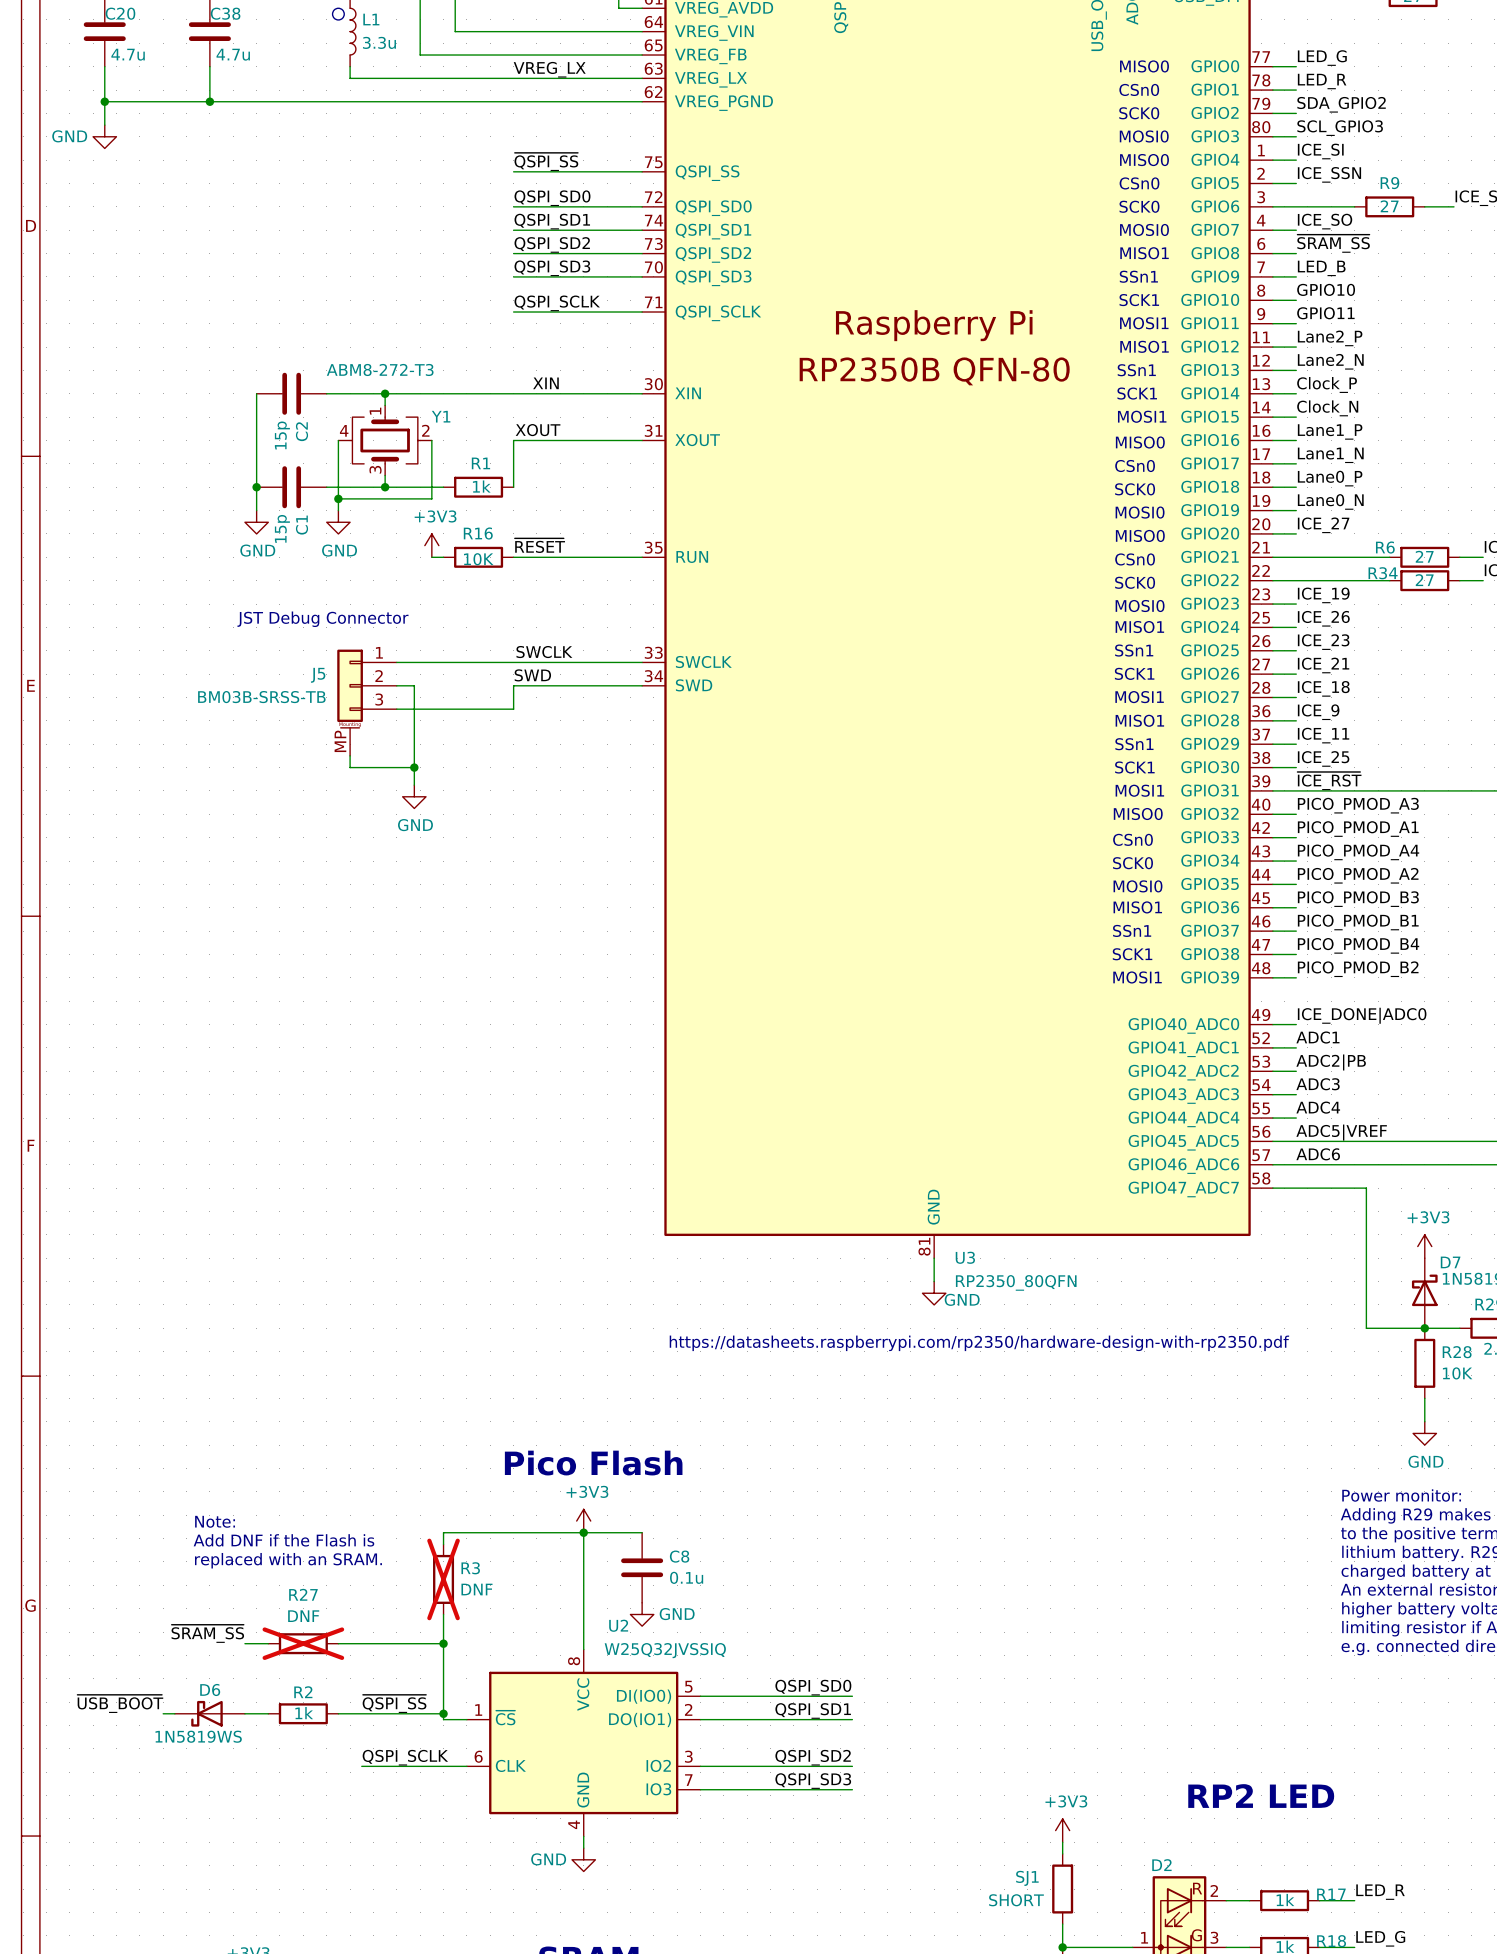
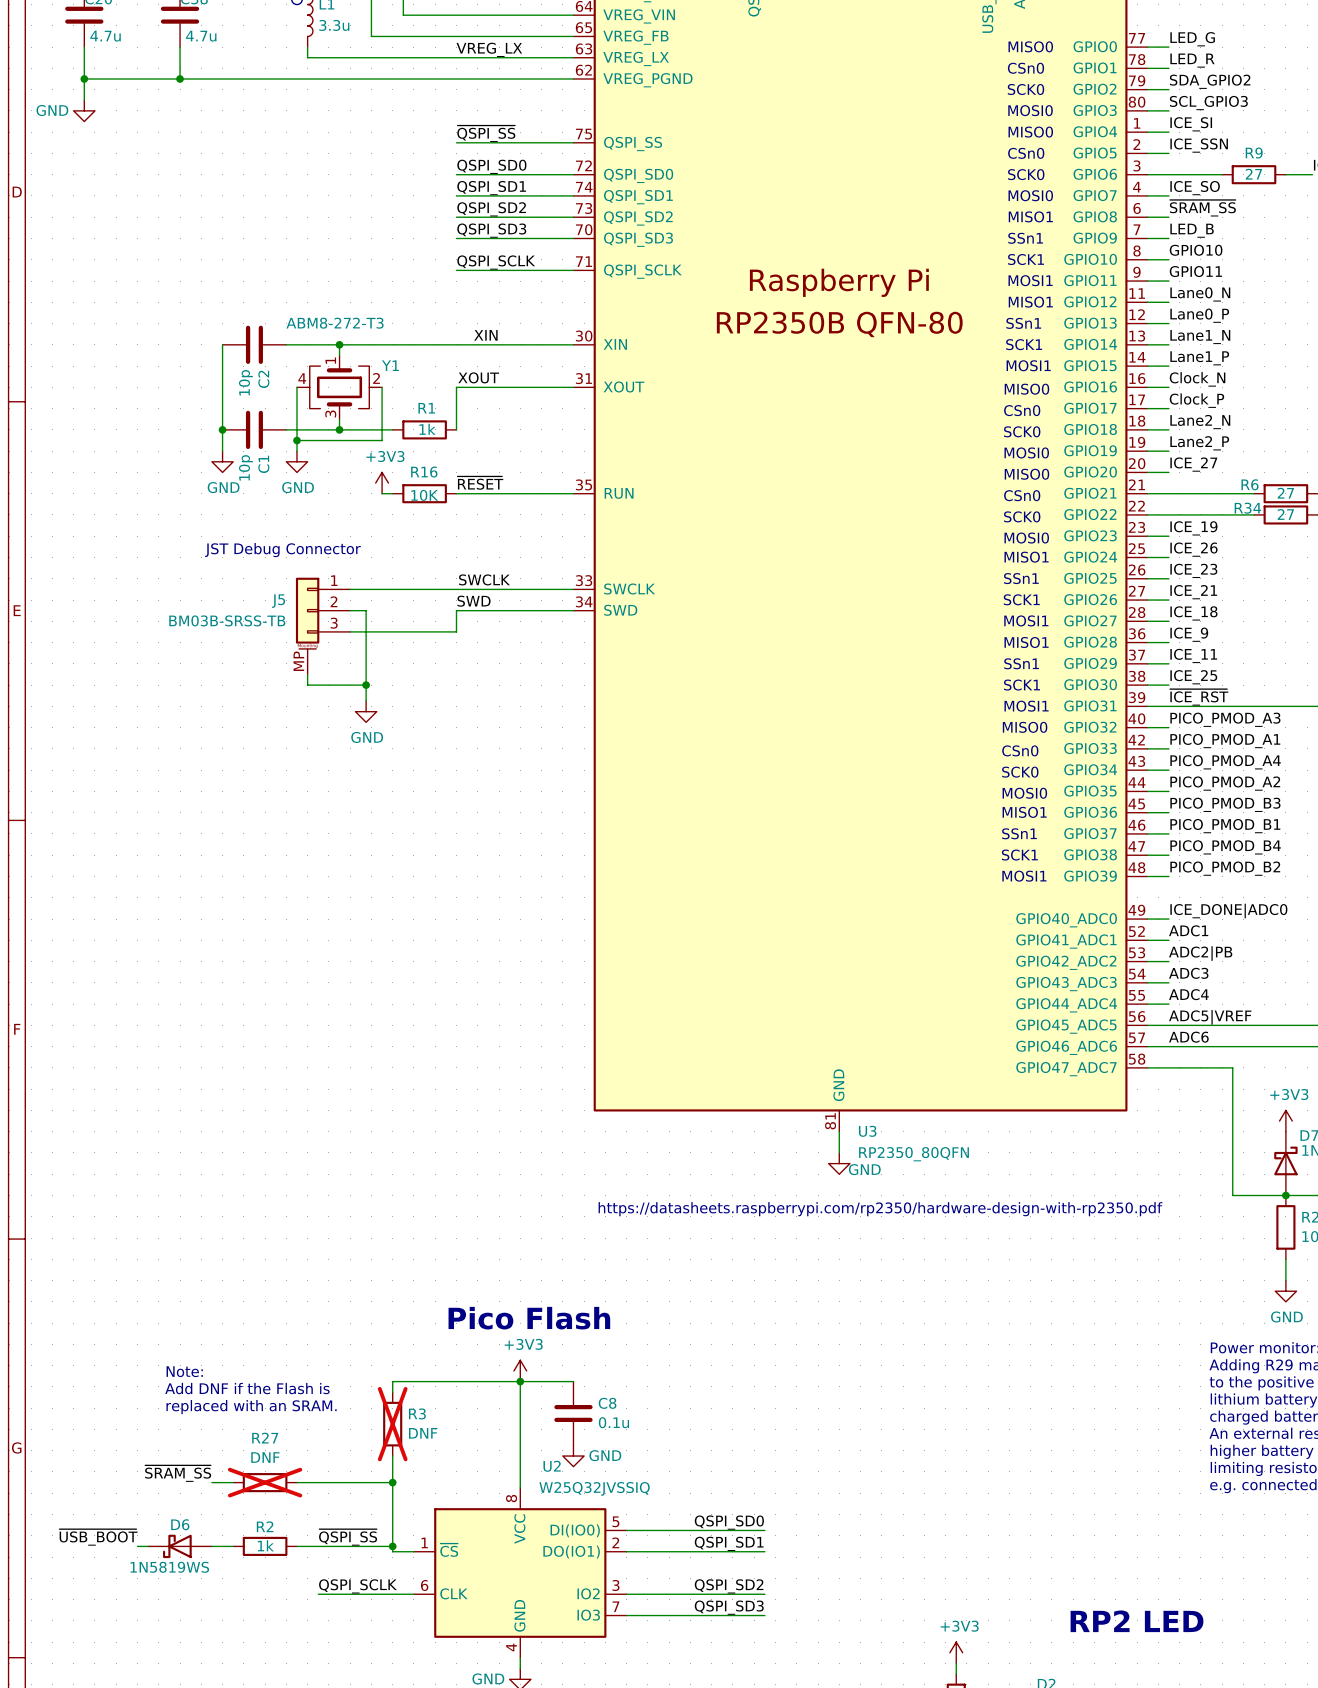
label: Lane2_P (1330, 338) -> Lane0_N (1200, 294)
label: Lane2_N (1330, 361) -> Lane0_P (1199, 315)
label: Clock_P (1327, 384) -> Lane1_N (1200, 337)
label: Clock_N (1327, 408) -> Lane1_P (1199, 358)
label: Lane1_P (1330, 431) -> Clock_N (1197, 379)
C2 value: 15p (282, 435) -> 10p (245, 382)
label: Lane1_N (1330, 455) -> Clock_P (1196, 400)
label: Lane0_P (1330, 478) -> Lane2_N (1200, 422)
label: Lane0_N (1330, 501) -> Lane2_P (1199, 443)
C1 value: 15p (282, 528) -> 10p (245, 467)

